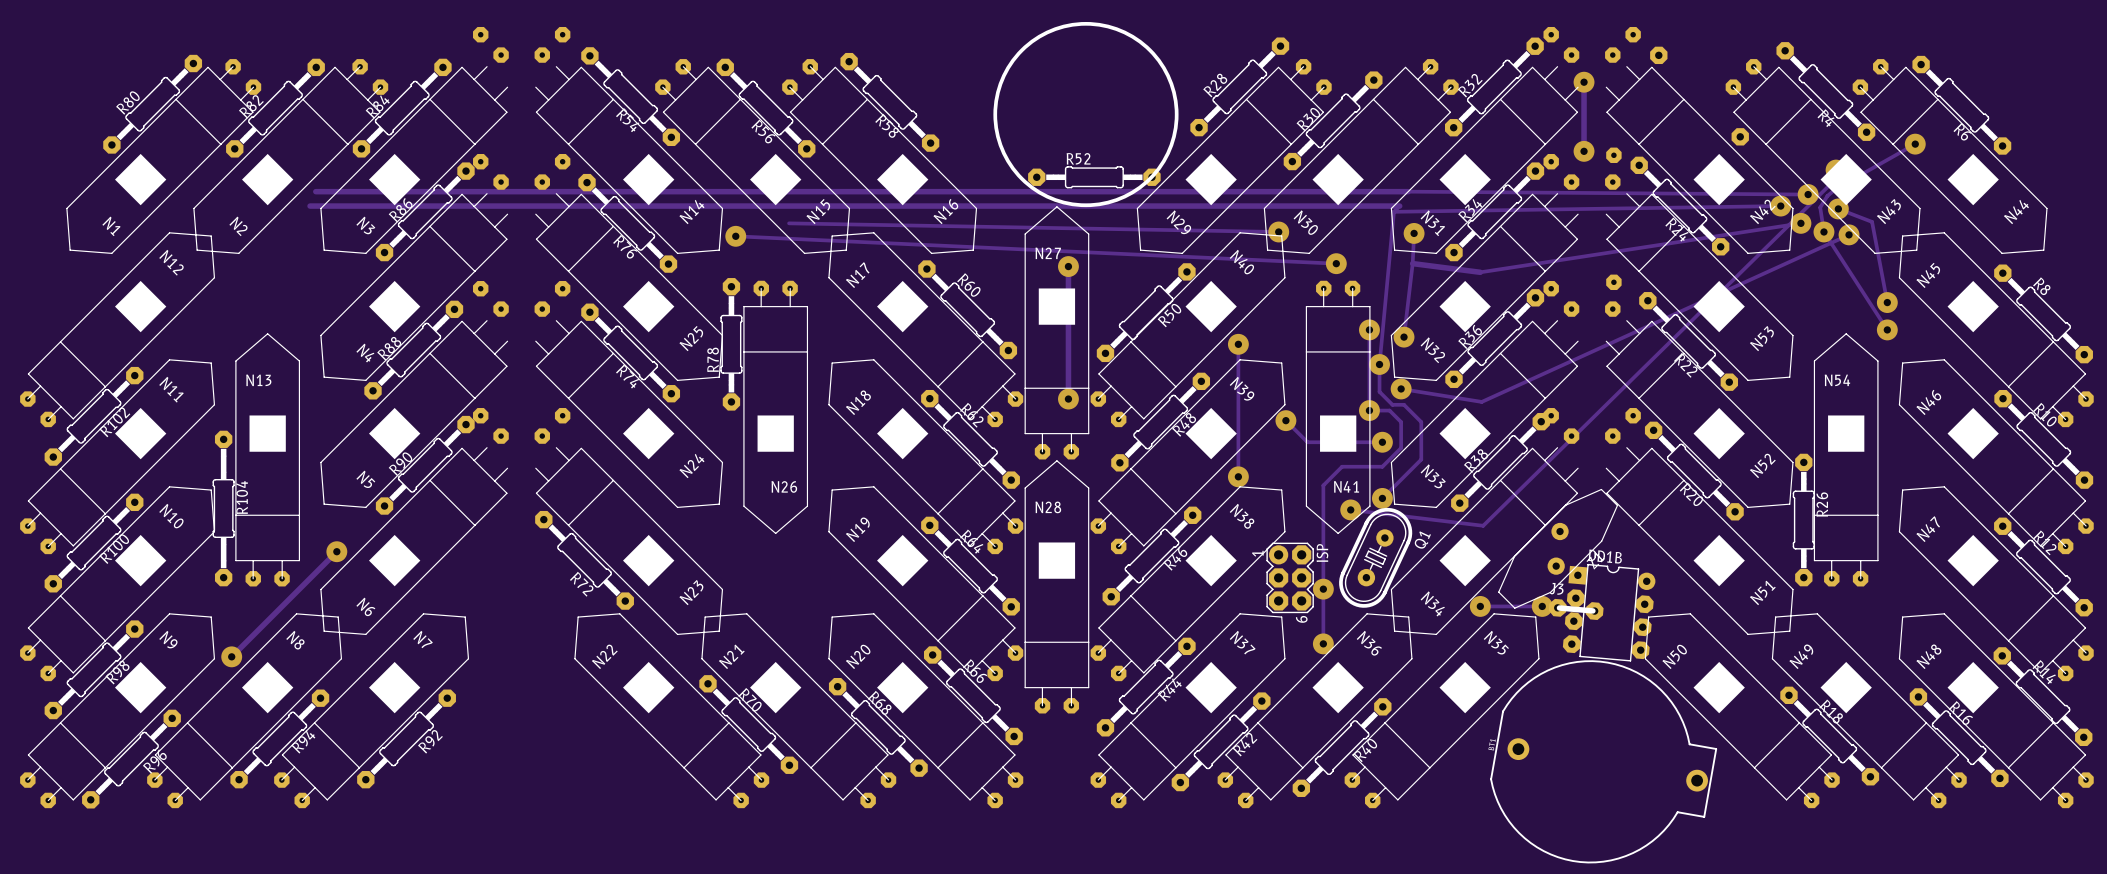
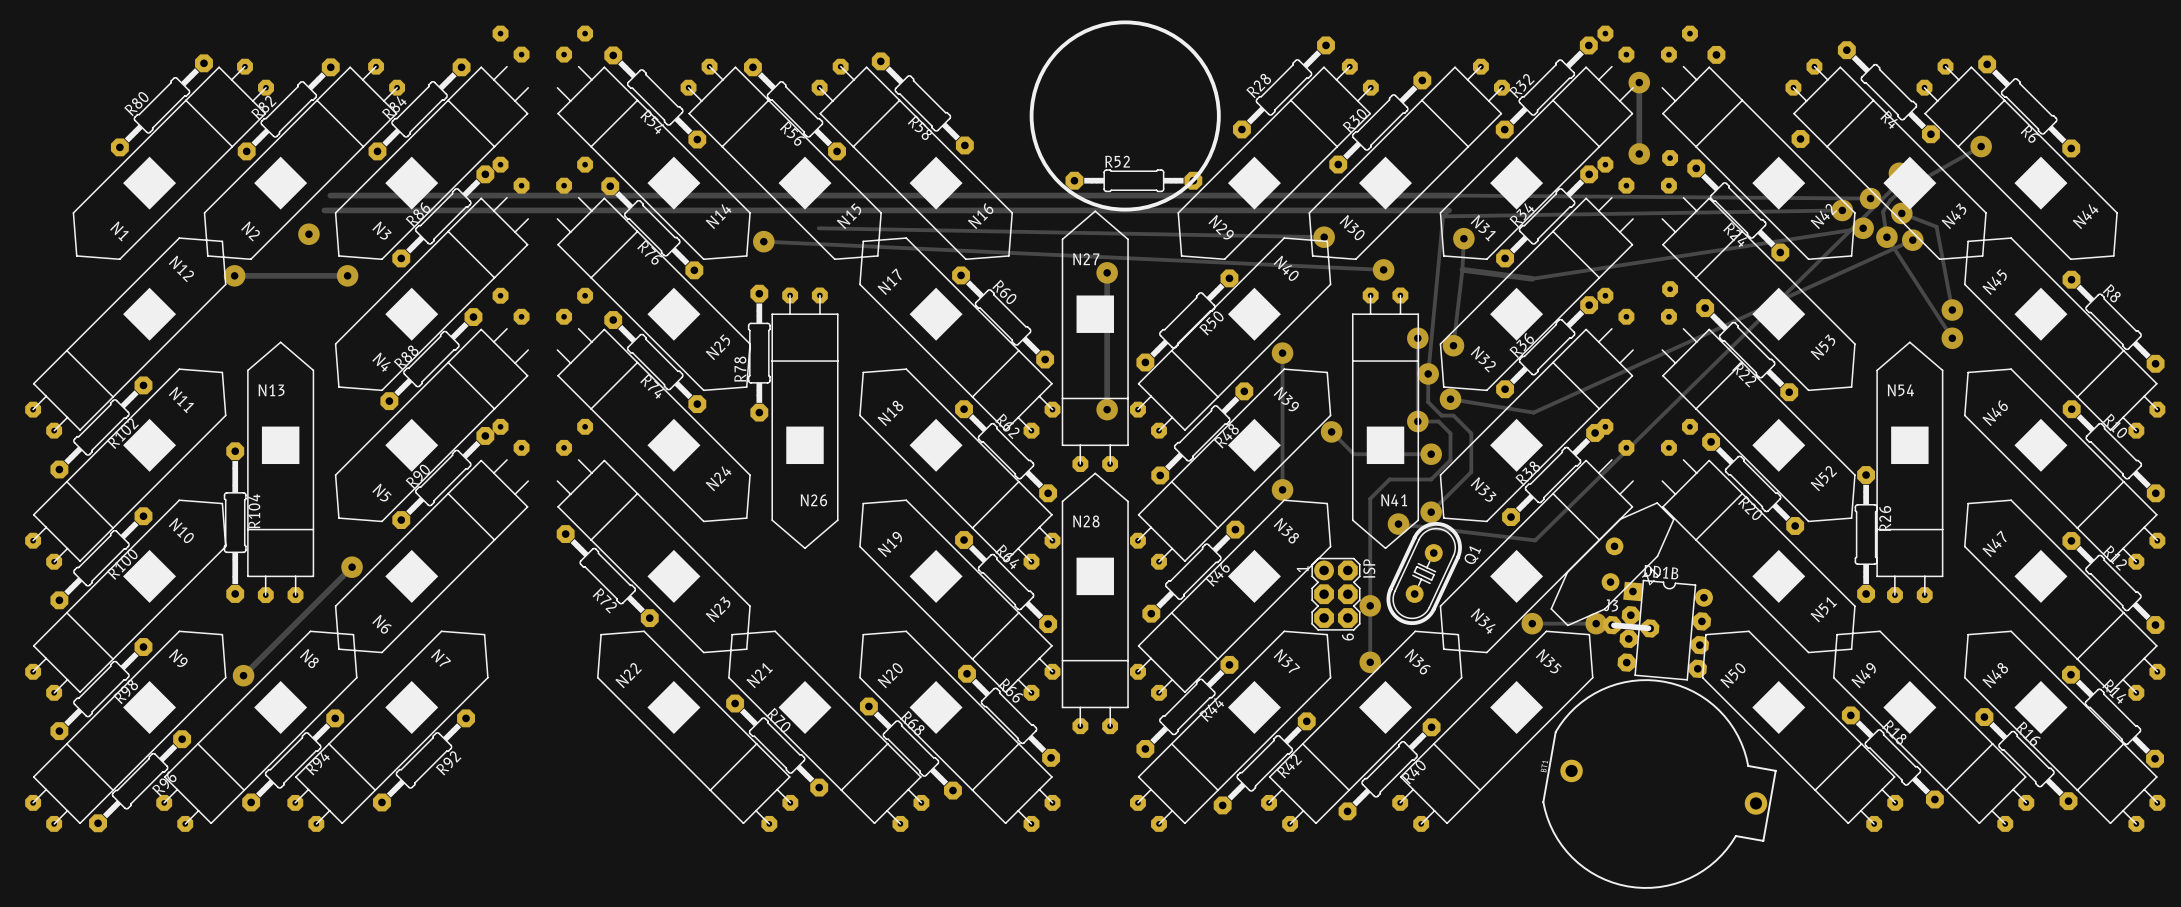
via: none -> (308, 234)
track: none -> (234, 275) (347, 275)
via: none -> (234, 275)
via: none -> (347, 275)

